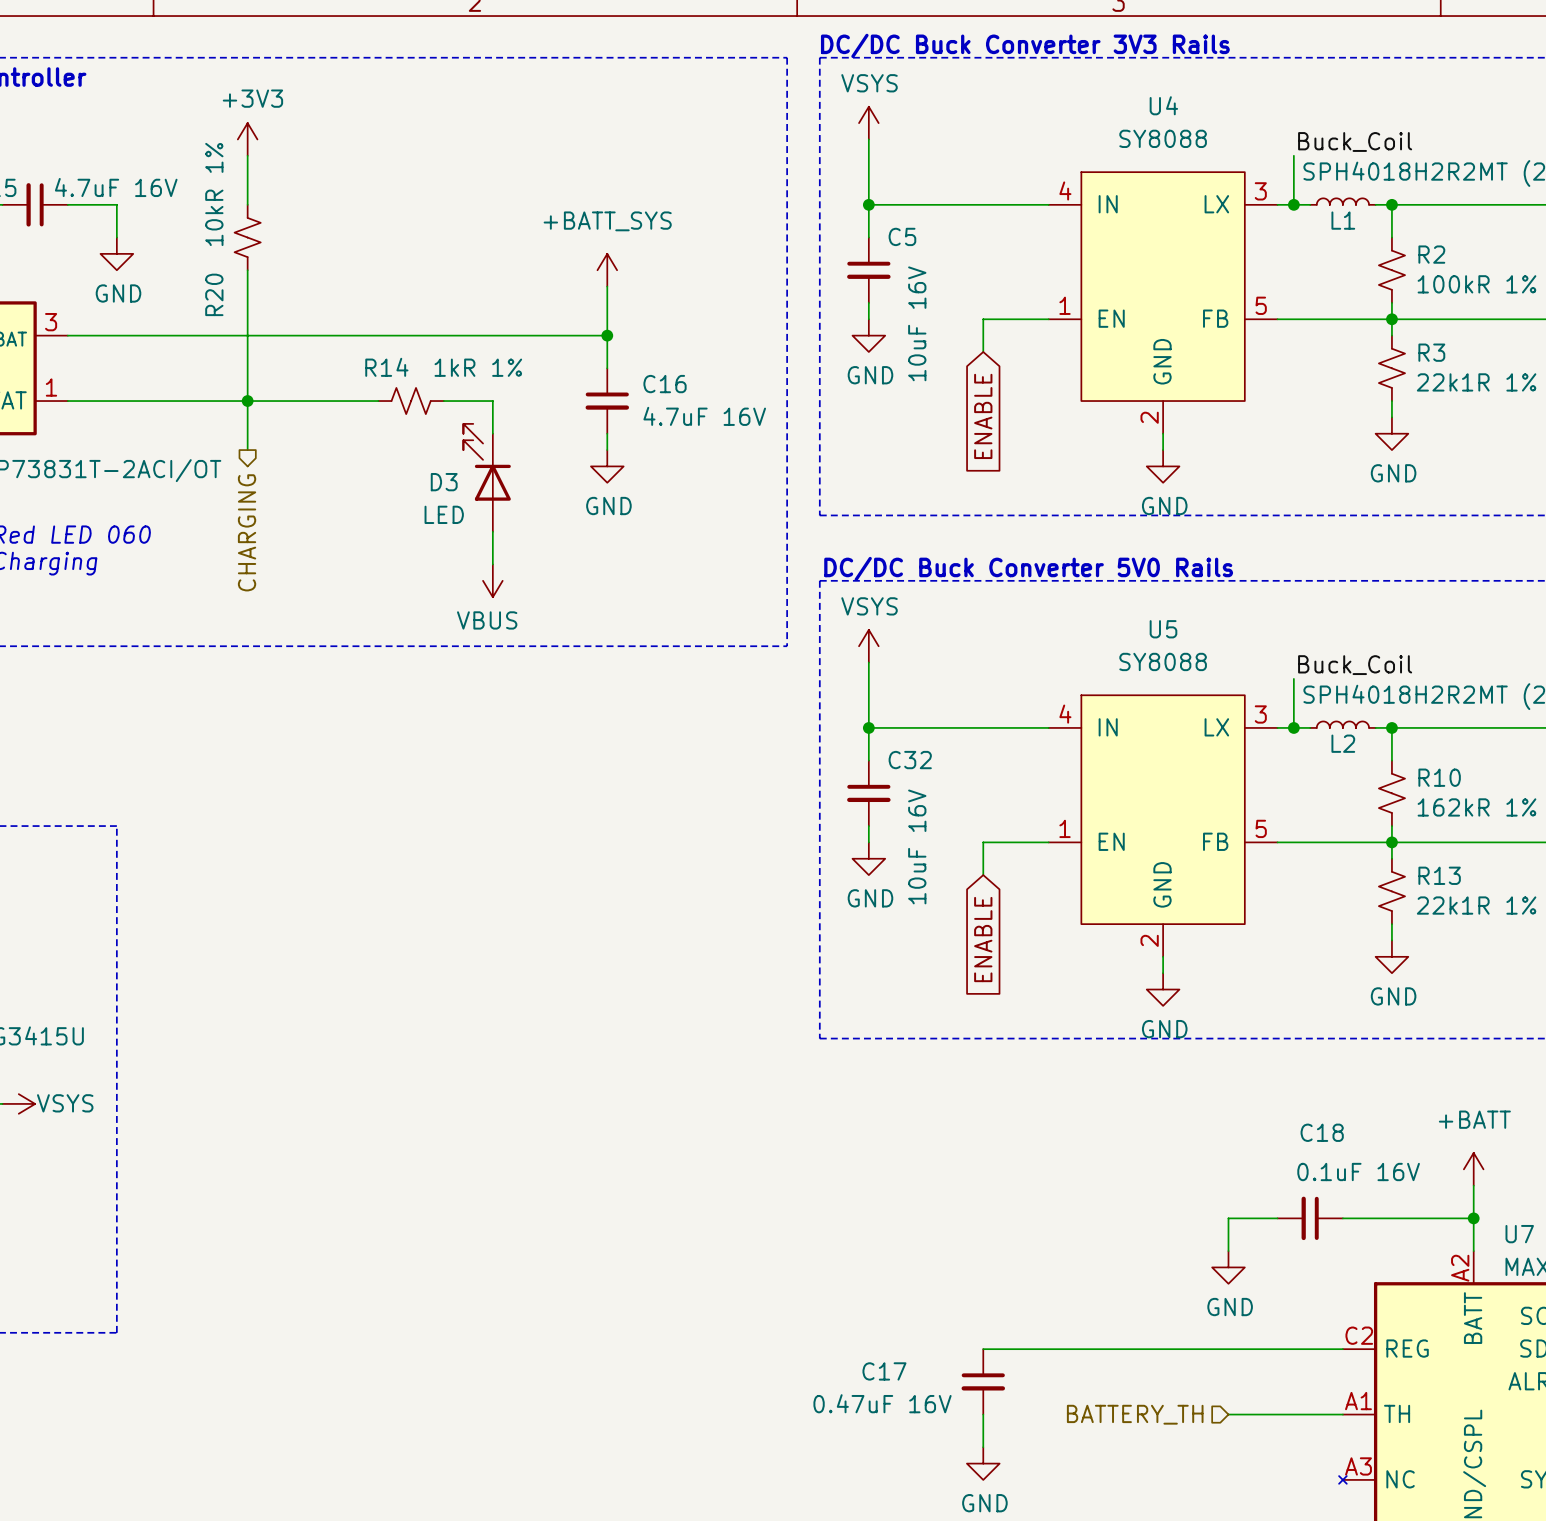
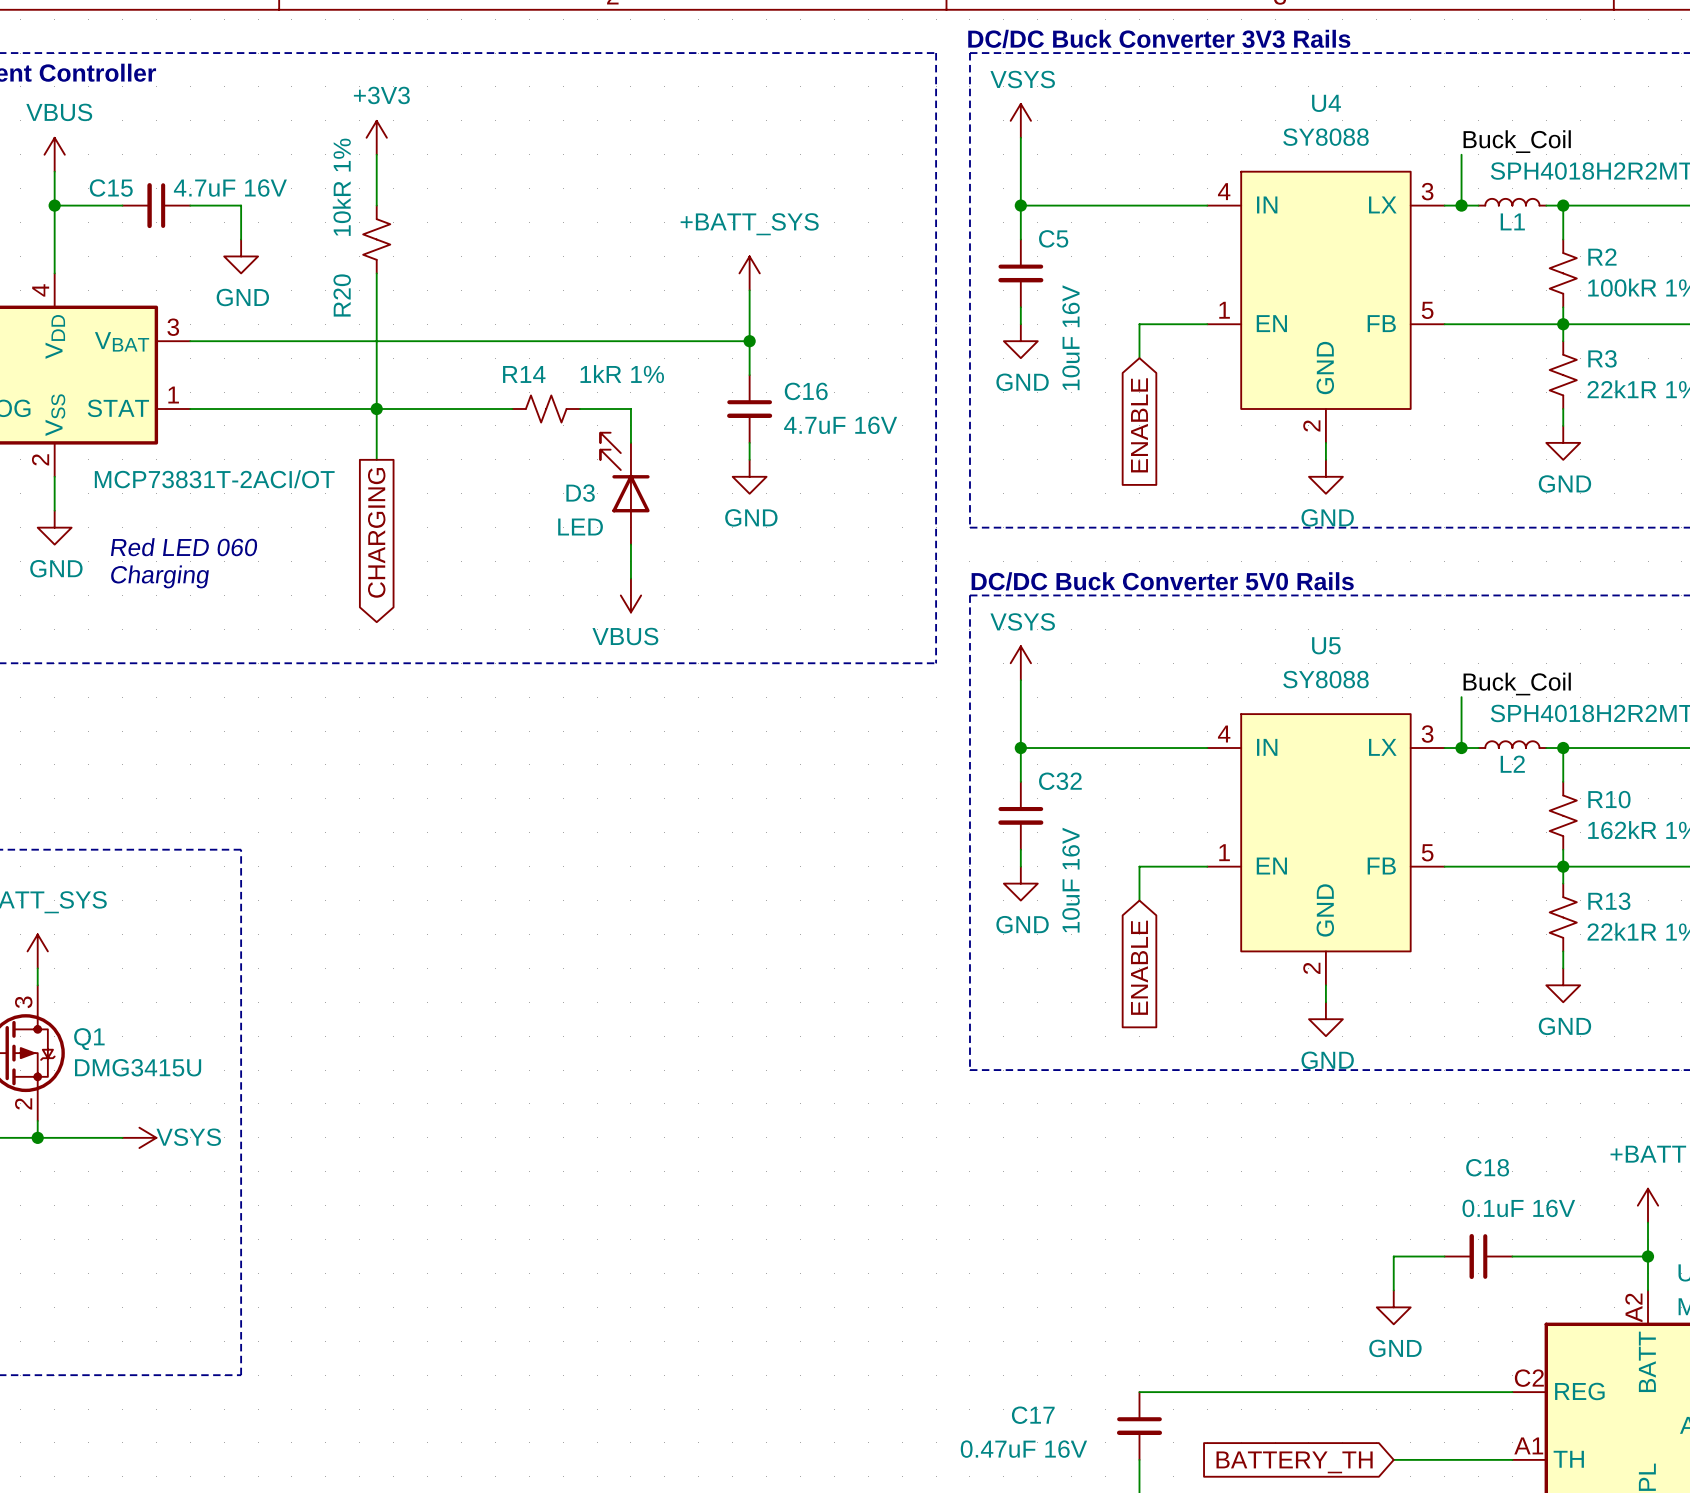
global label: none -> CHARGING (376, 532)
hierarchical label: CHARGING (247, 532) -> none
hierarchical label: BATTERY_TH (1135, 1414) -> none
global label: none -> BATTERY_TH (1294, 1462)

